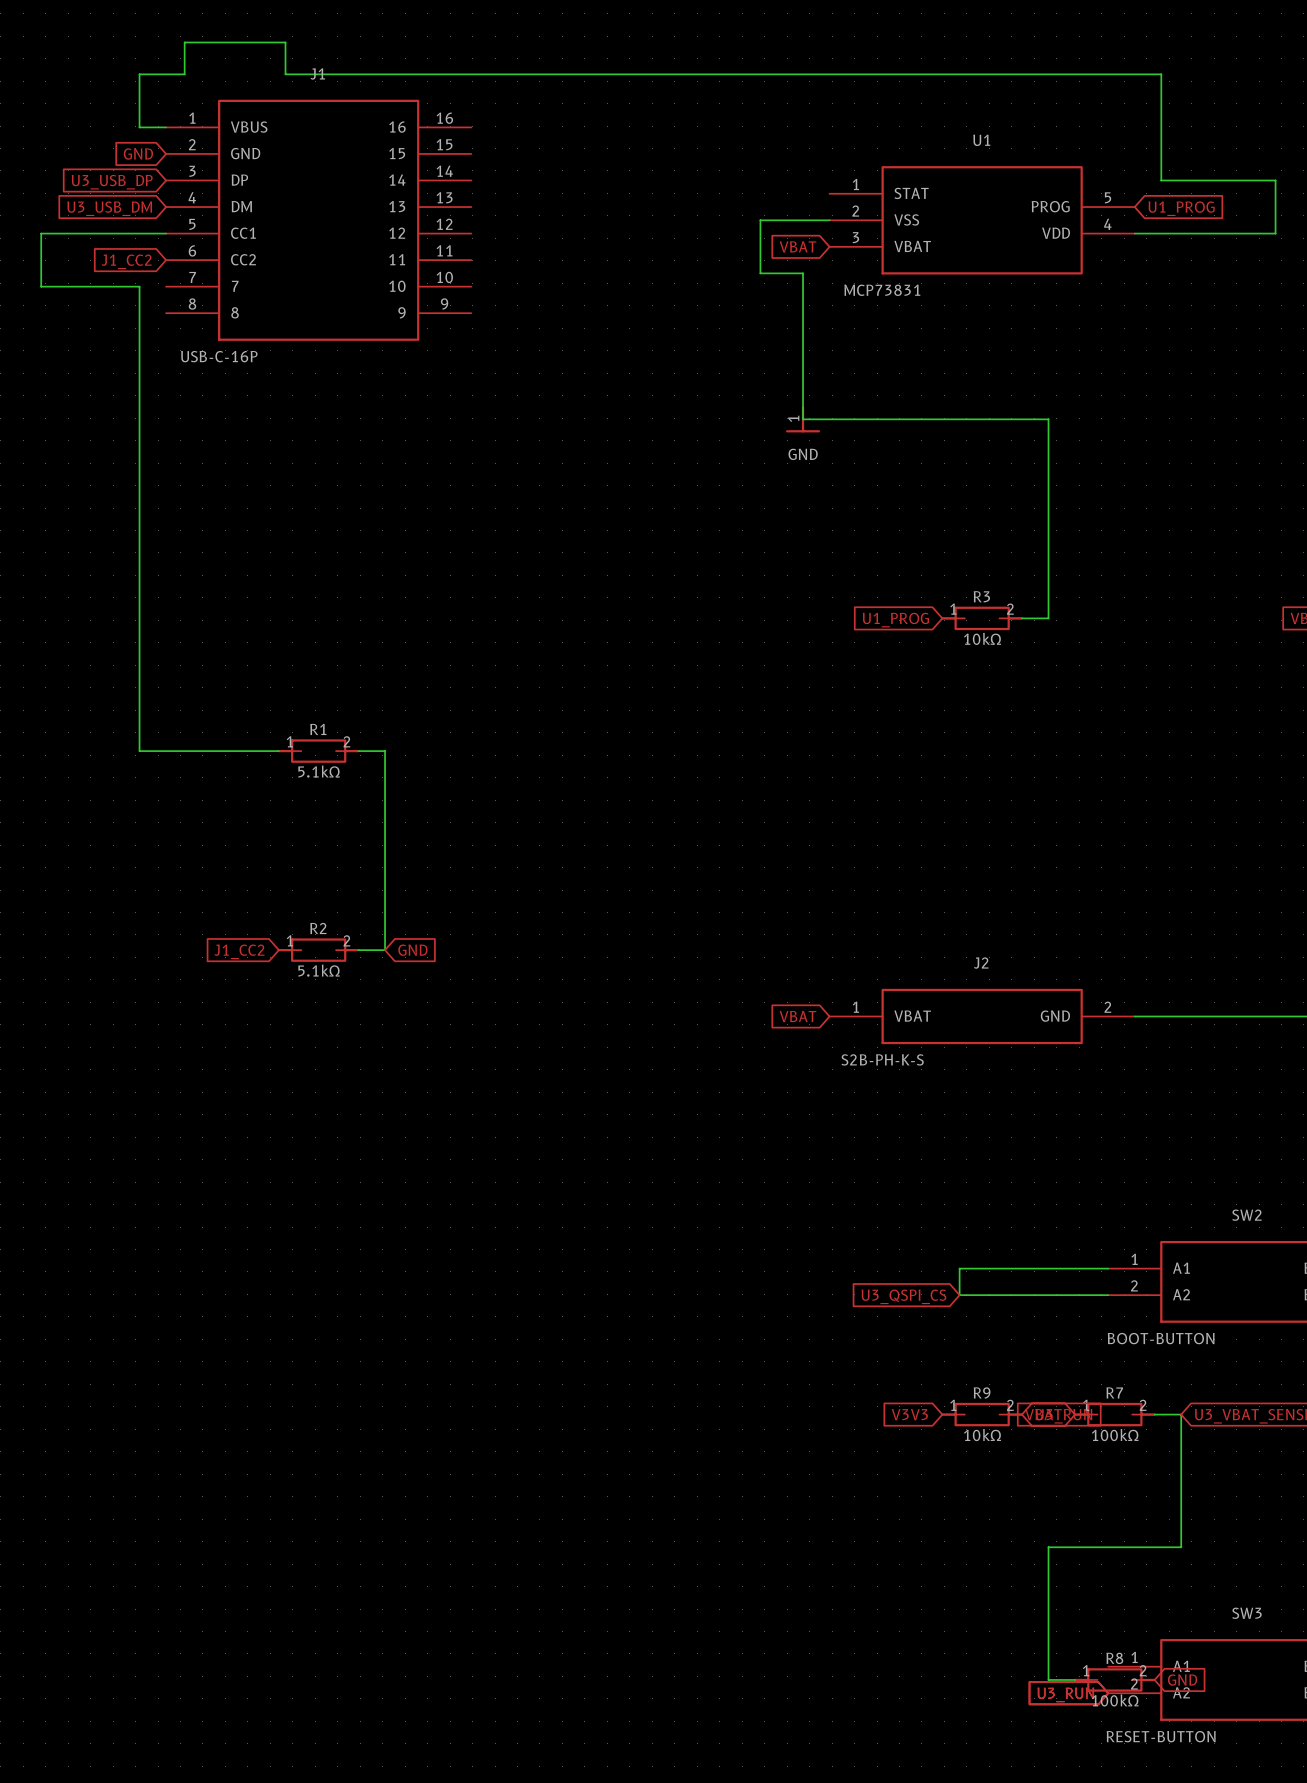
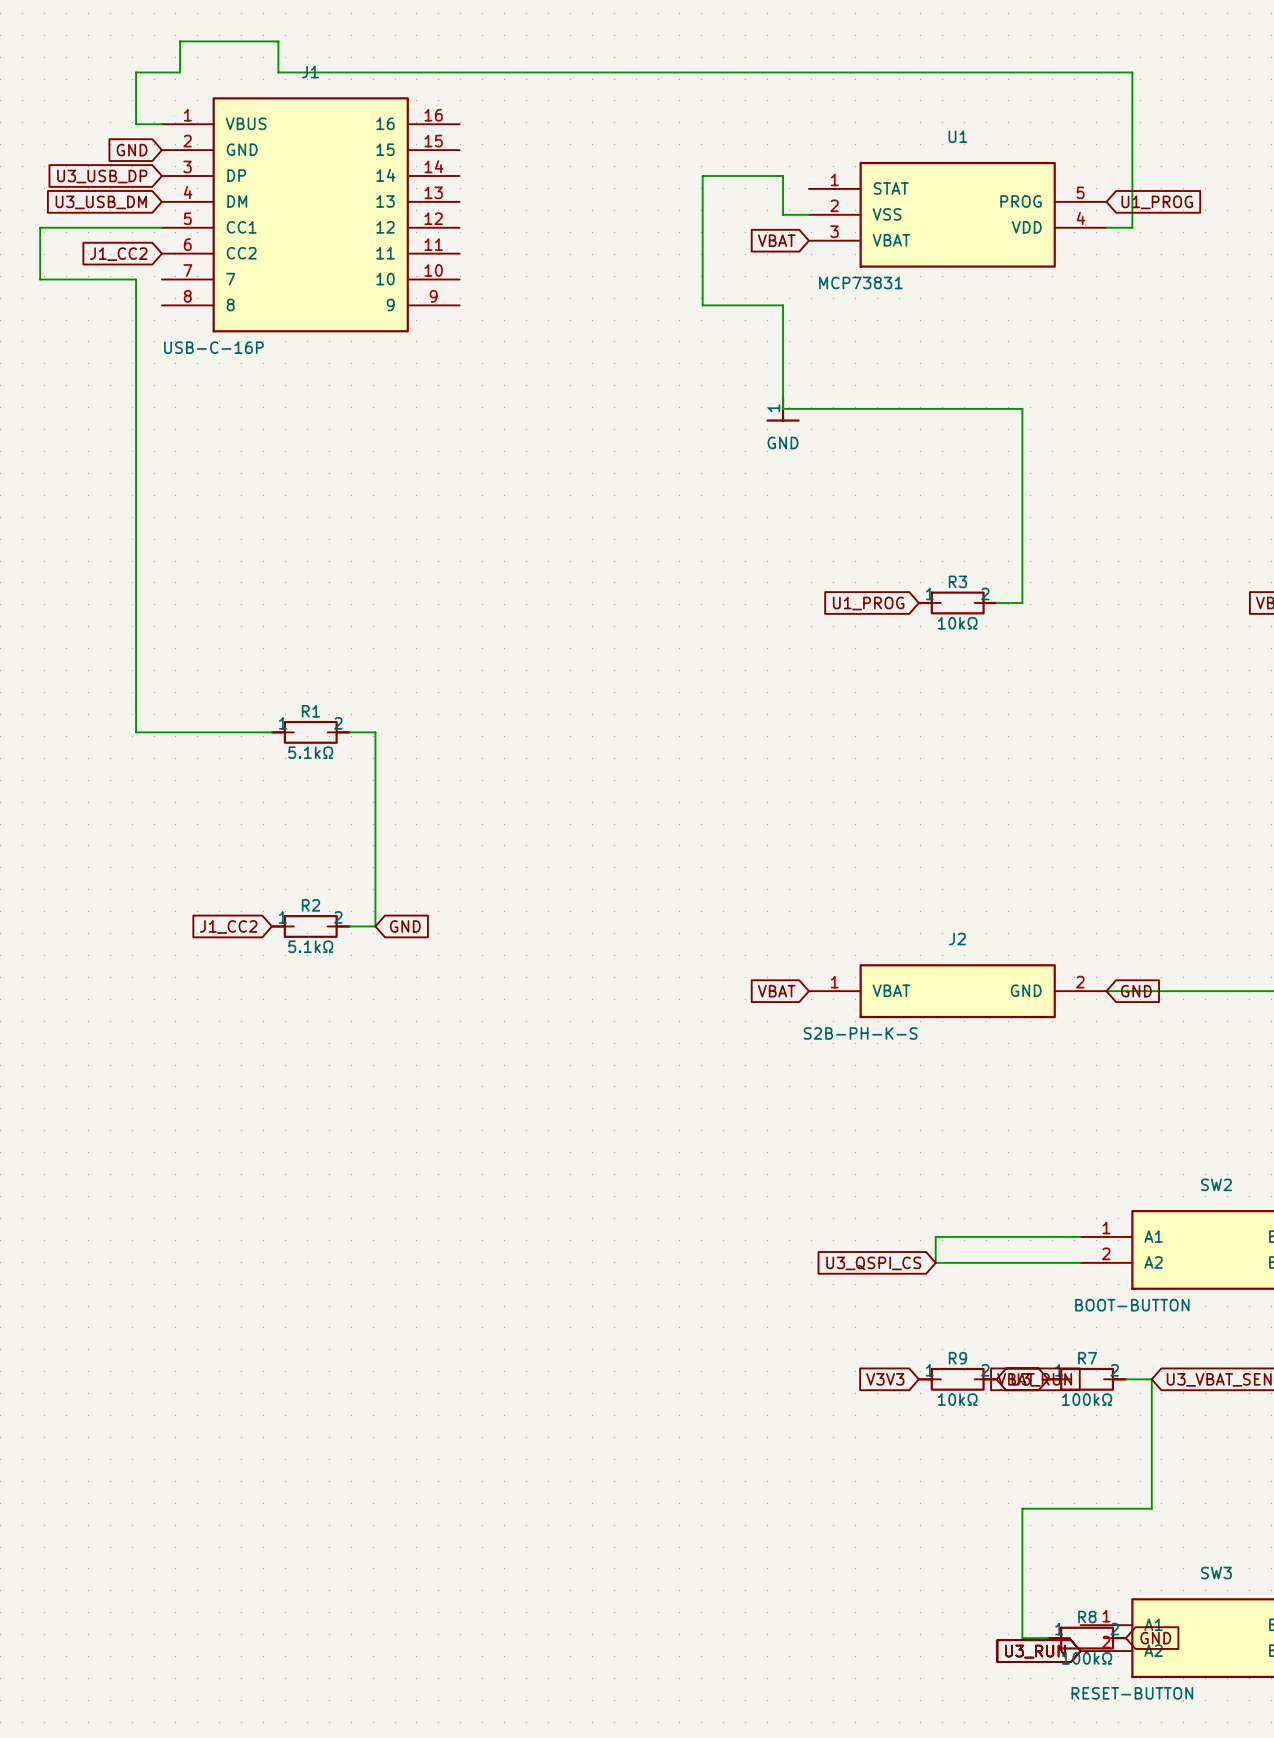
wire: (1161, 180) (1275, 180) (1275, 233) (1161, 233) -> (1132, 175) (1132, 227)
wire: (803, 220) (760, 220) (760, 273) (803, 273) (803, 313) -> (783, 214) (783, 175) (702, 175) (702, 305) (783, 305)
global label: none -> GND (1136, 991)

